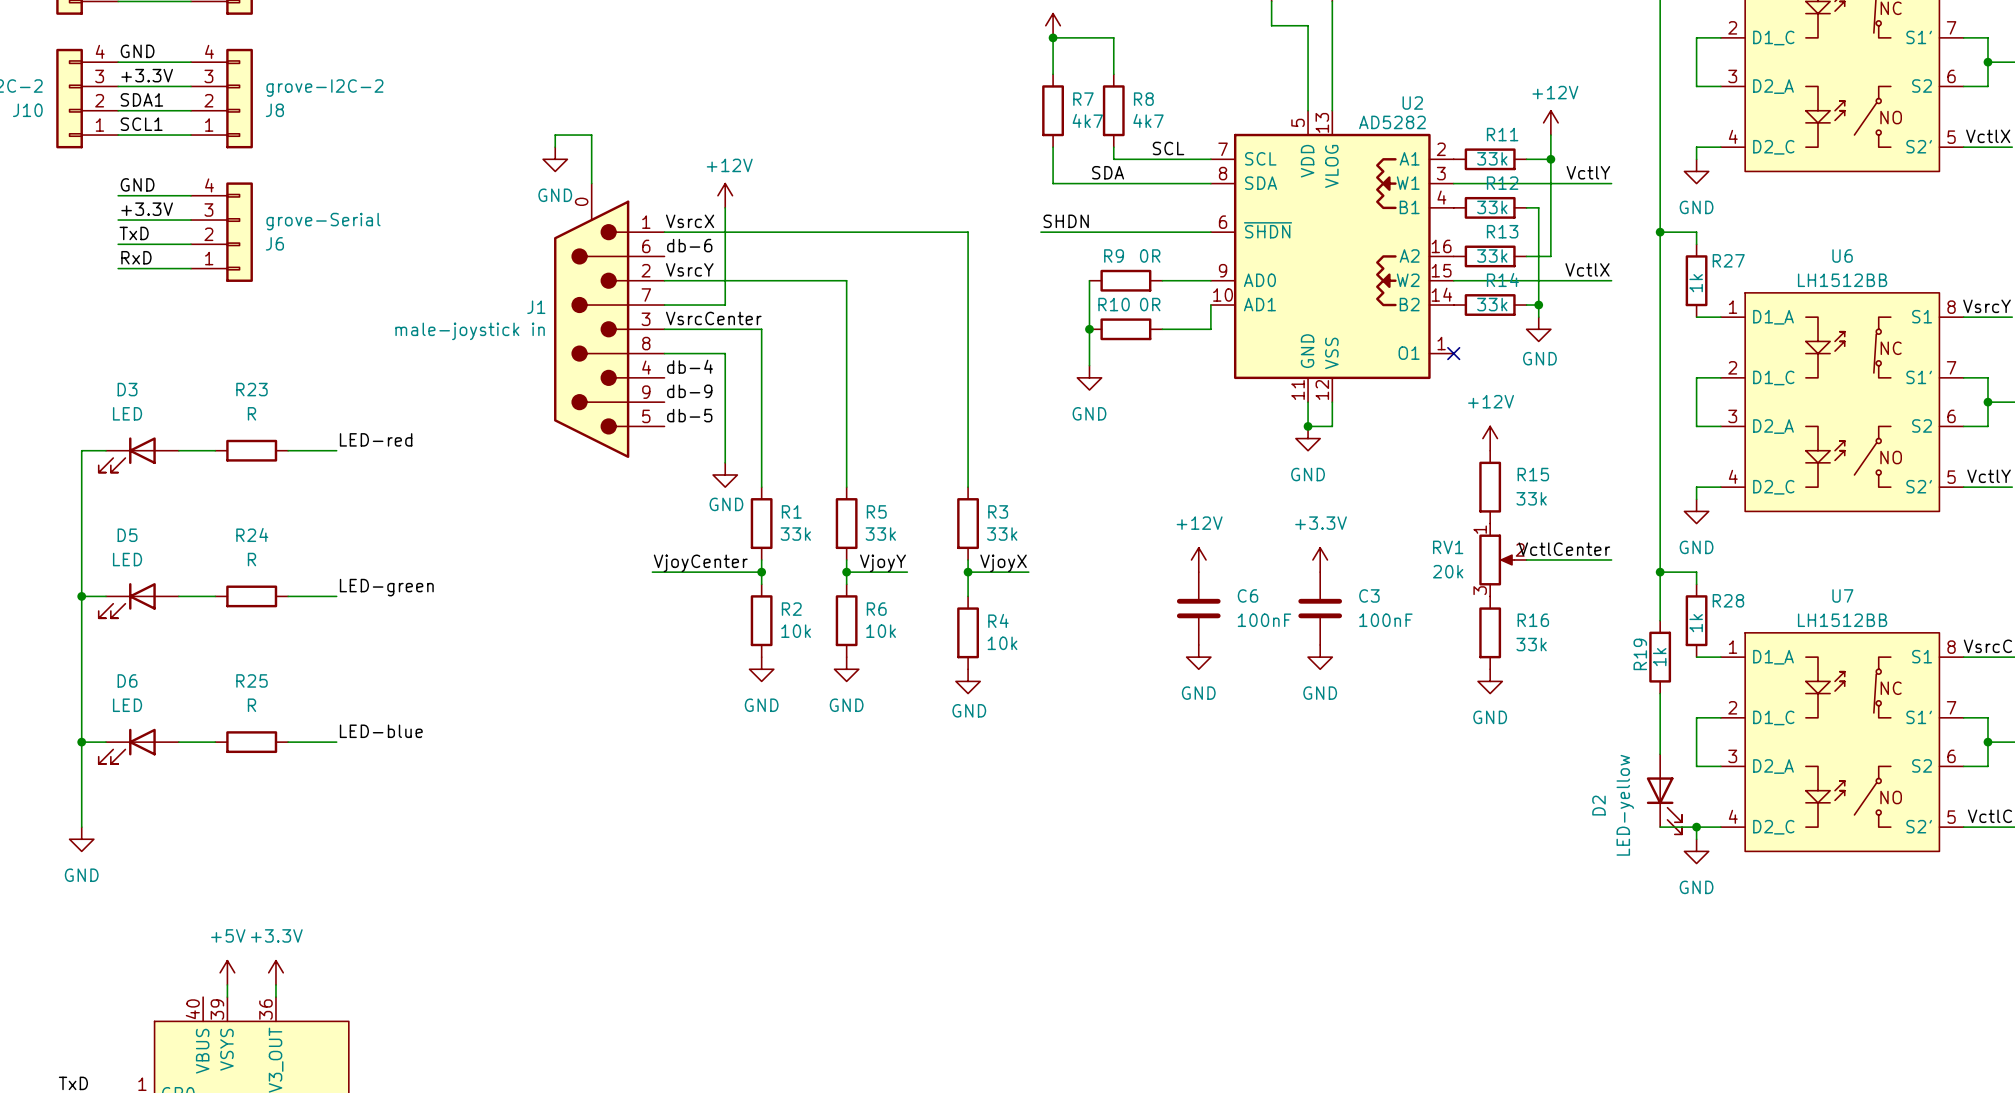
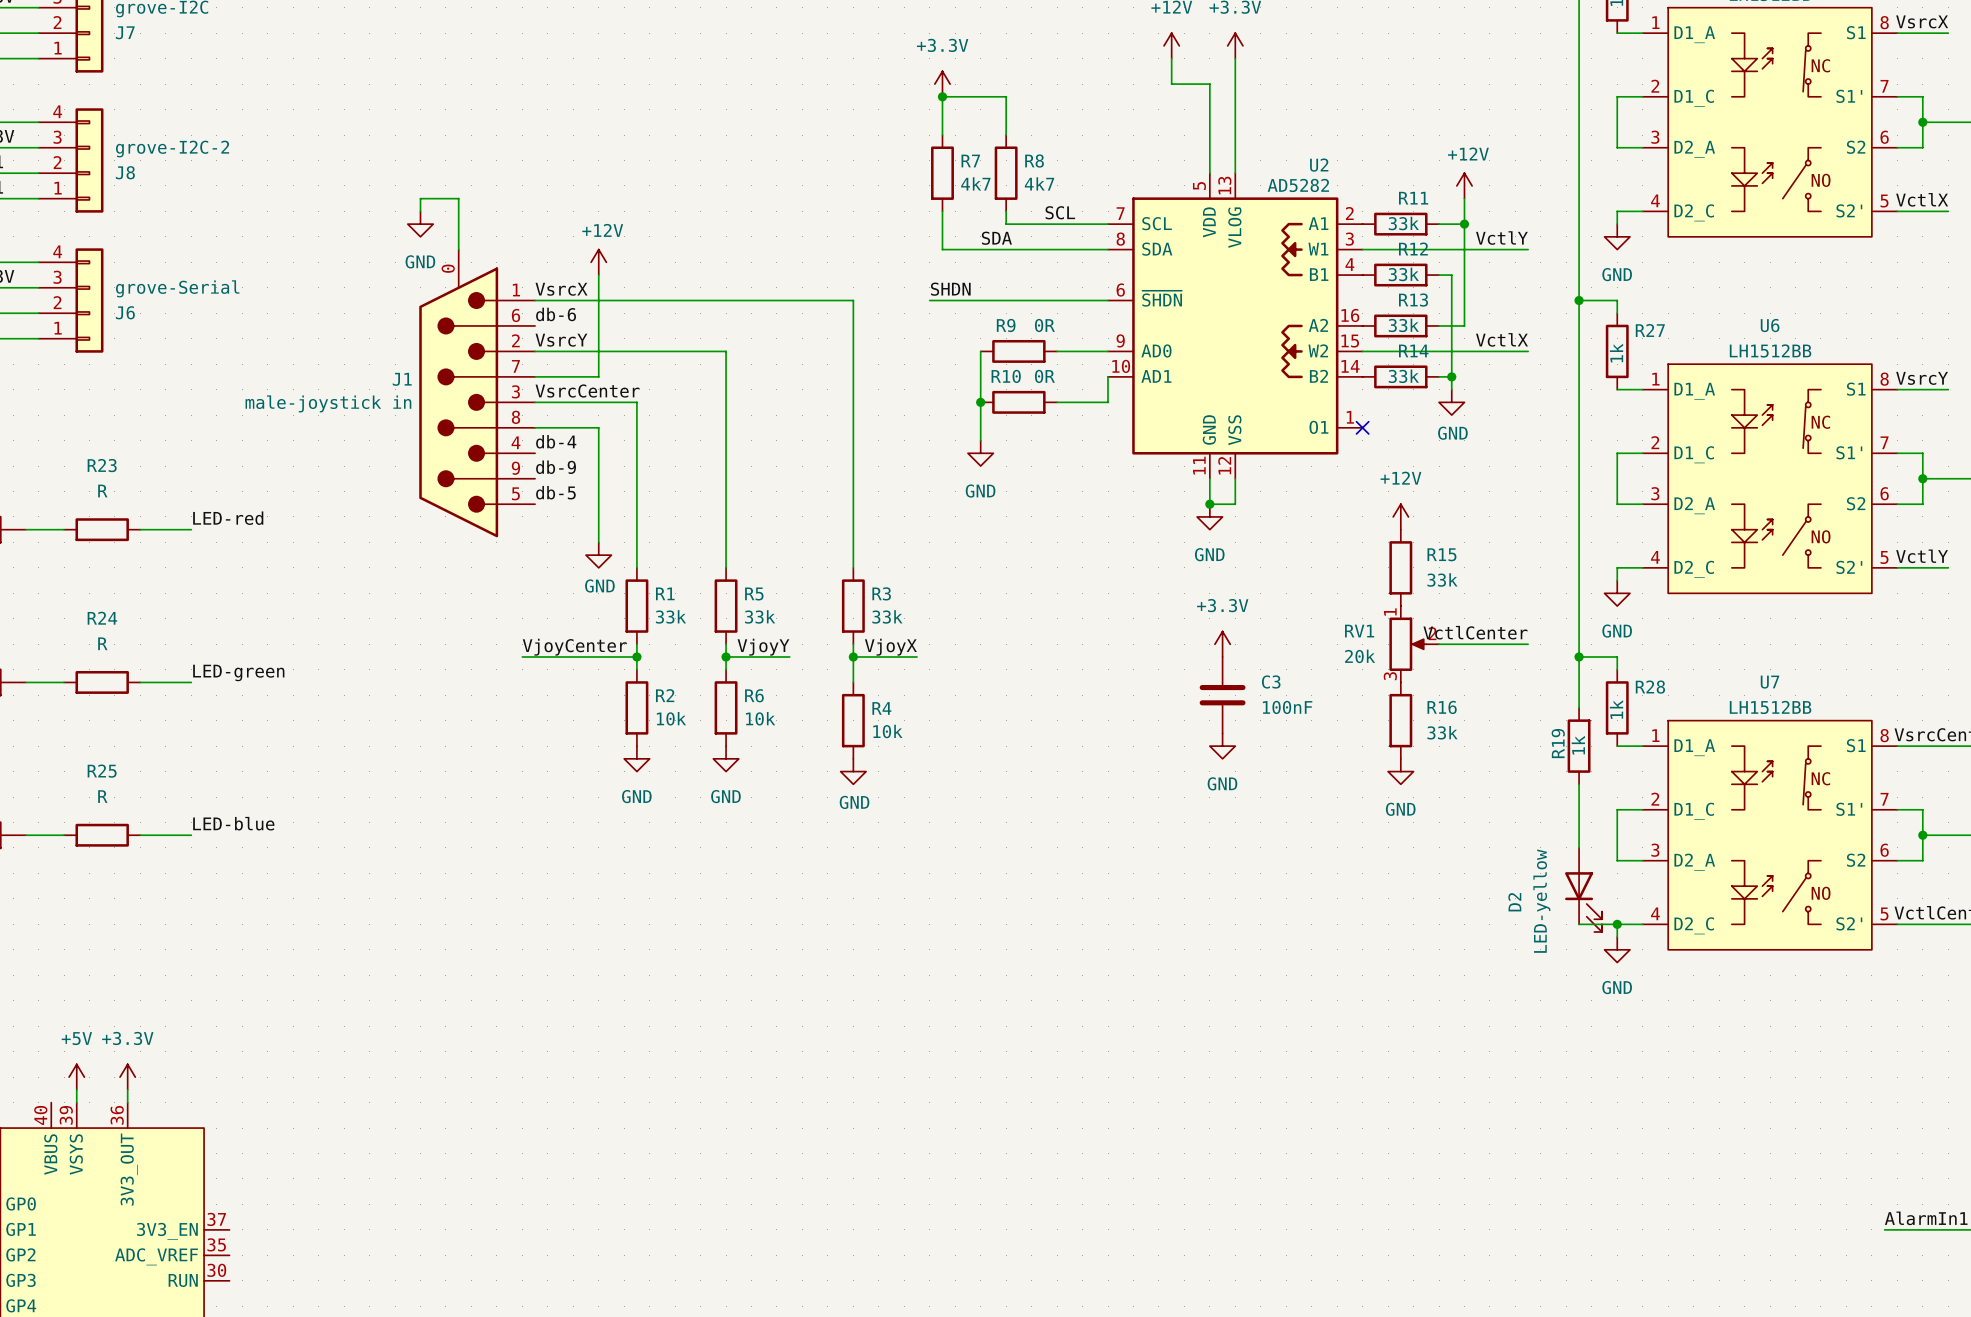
power symbol: +12V (1198, 559) -> none
C6: 100nF (1198, 608) -> none
power symbol: GND (1198, 657) -> none

